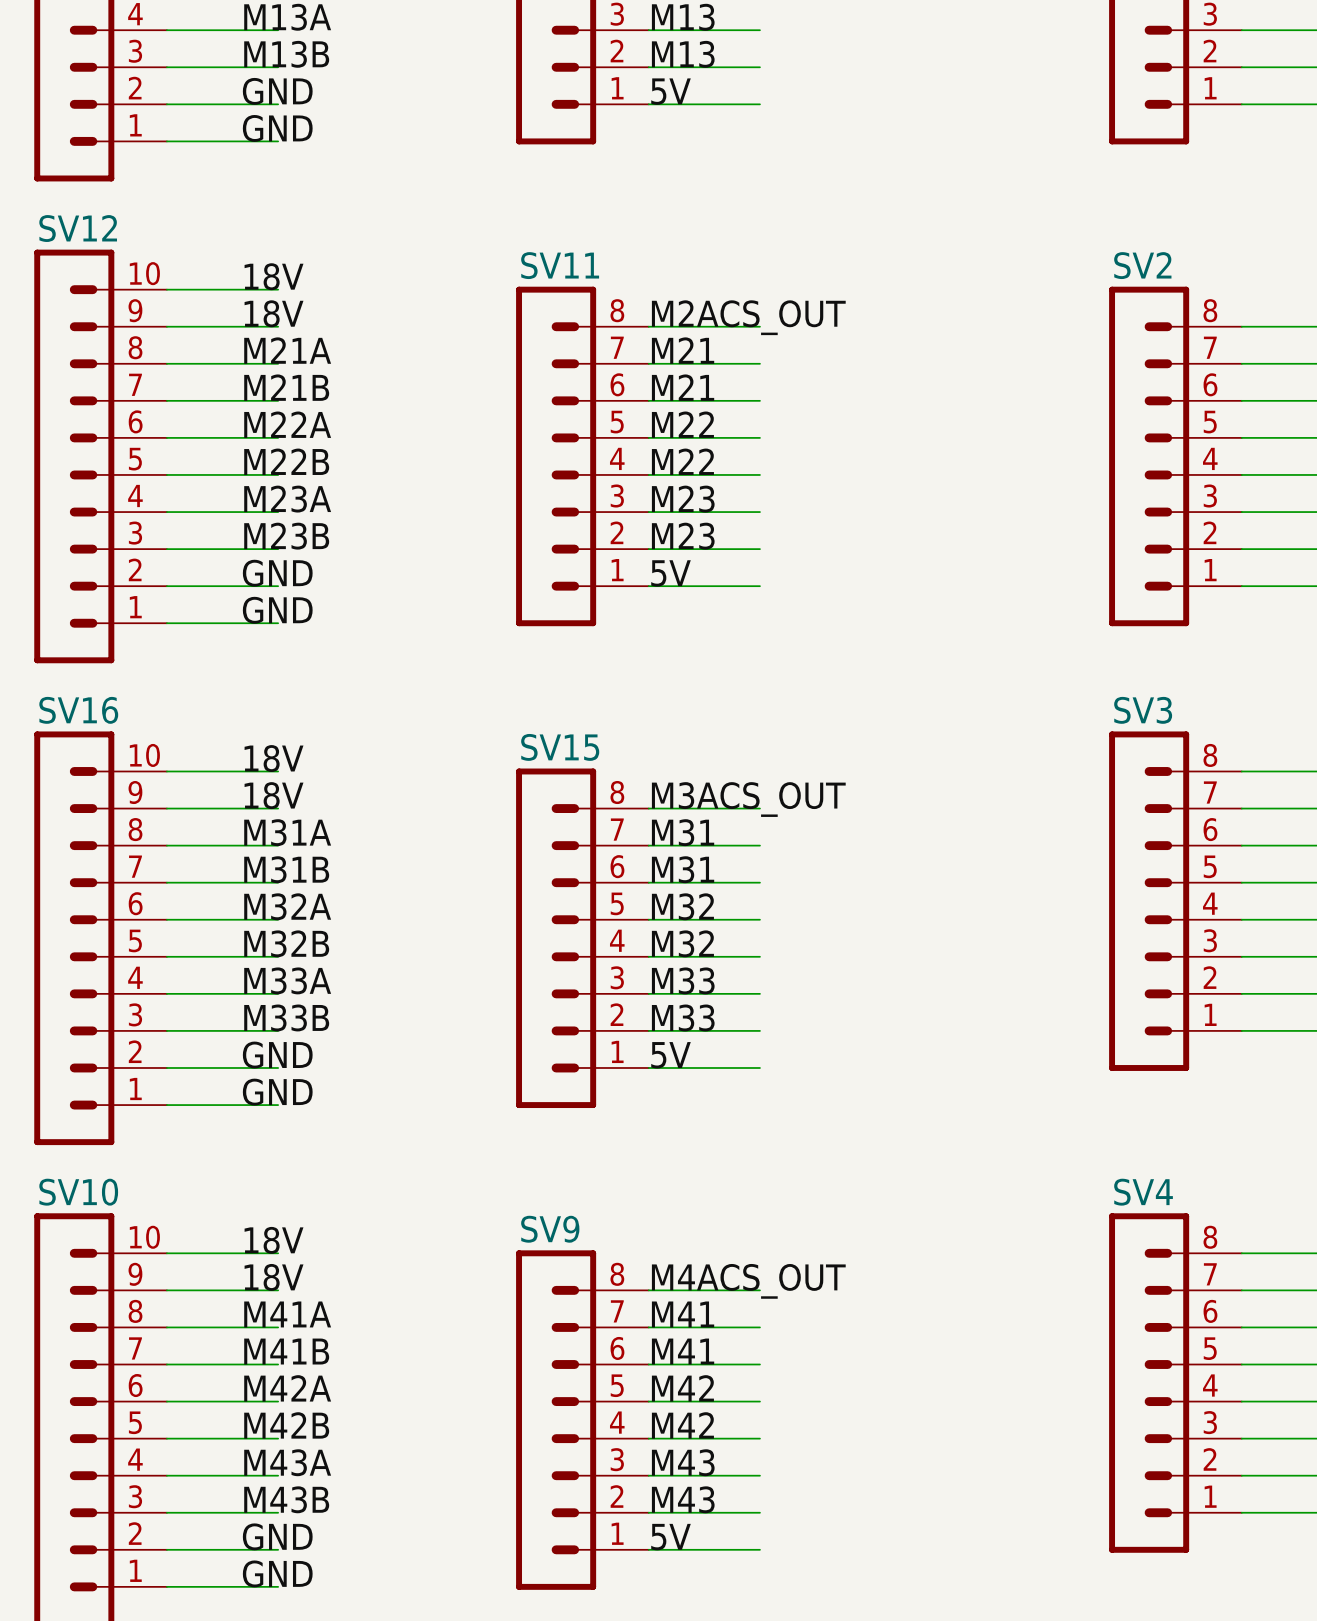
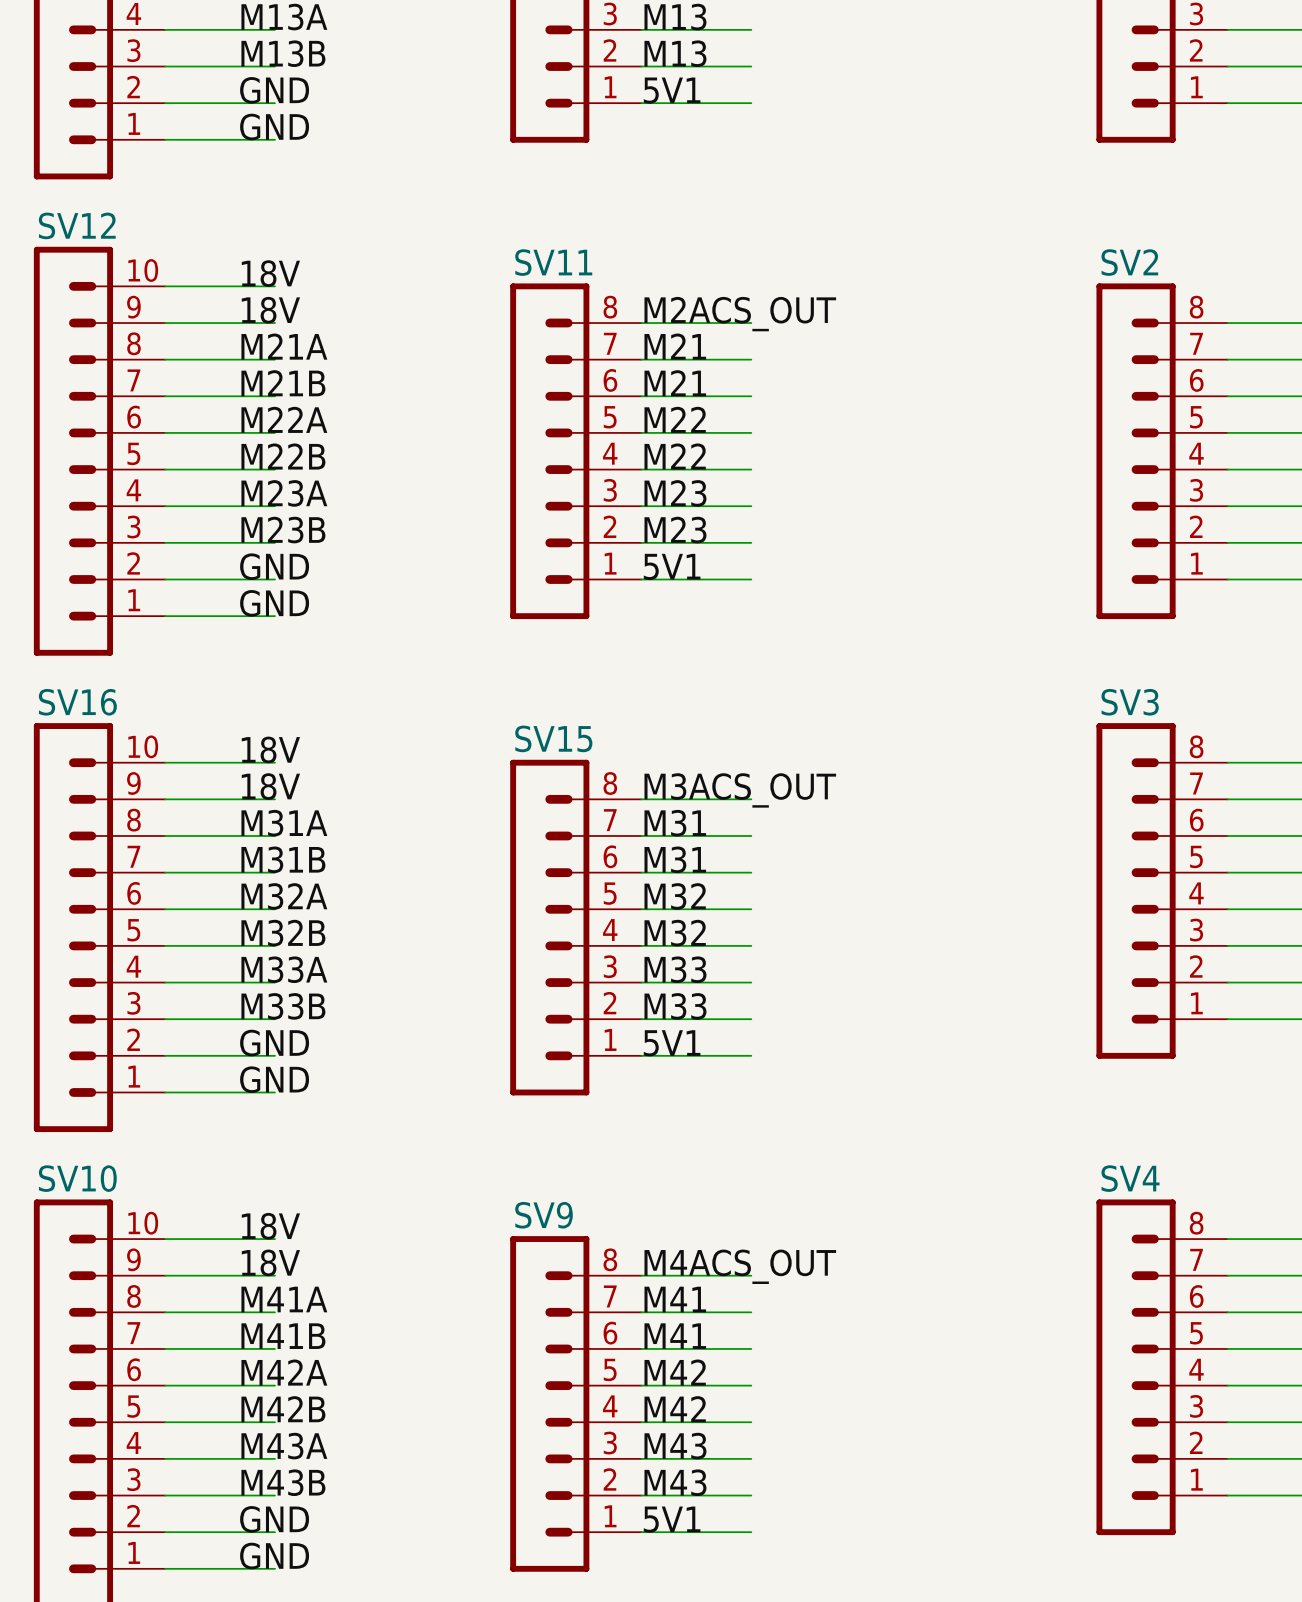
label: 5V (671, 91) -> 5V1 (672, 90)
label: 5V (671, 573) -> 5V1 (672, 566)
label: 5V (671, 1055) -> 5V1 (672, 1043)
label: 5V (671, 1537) -> 5V1 (672, 1519)

